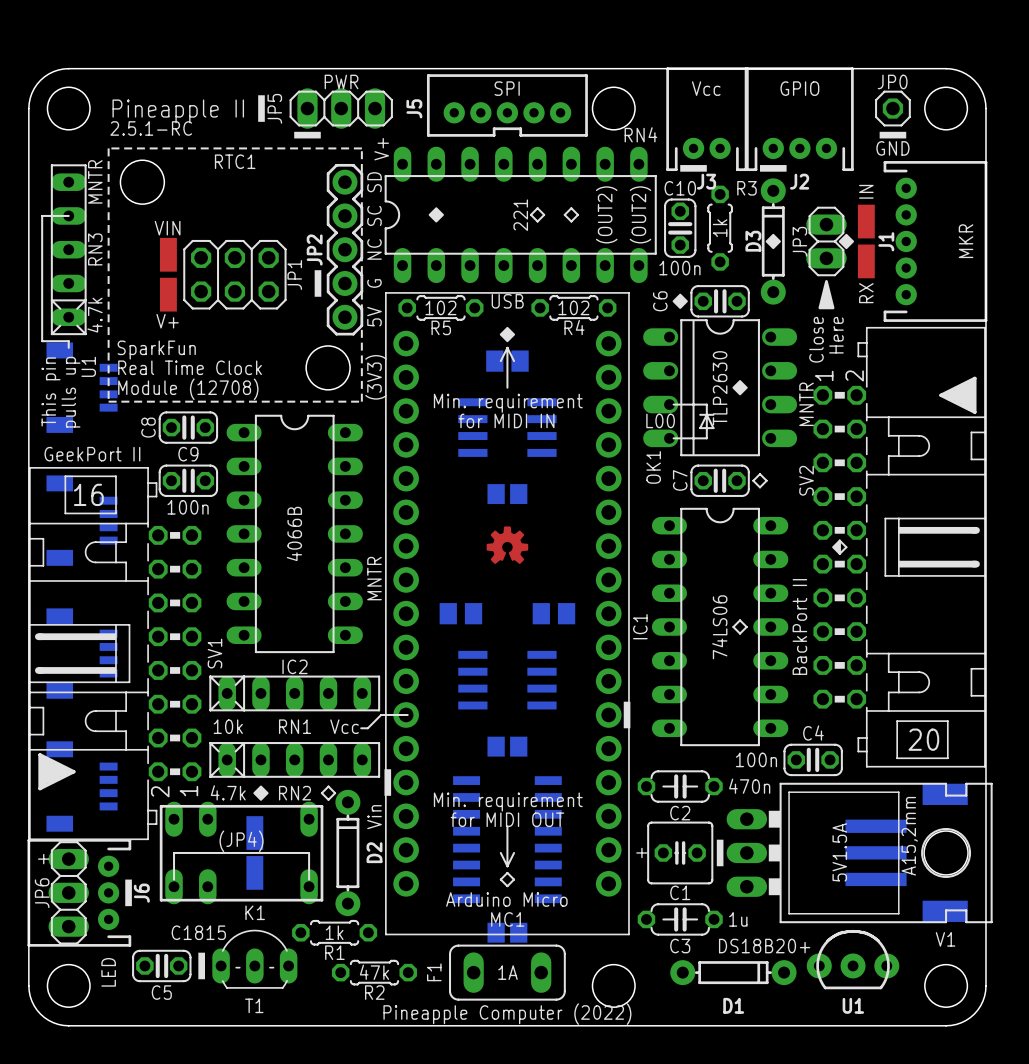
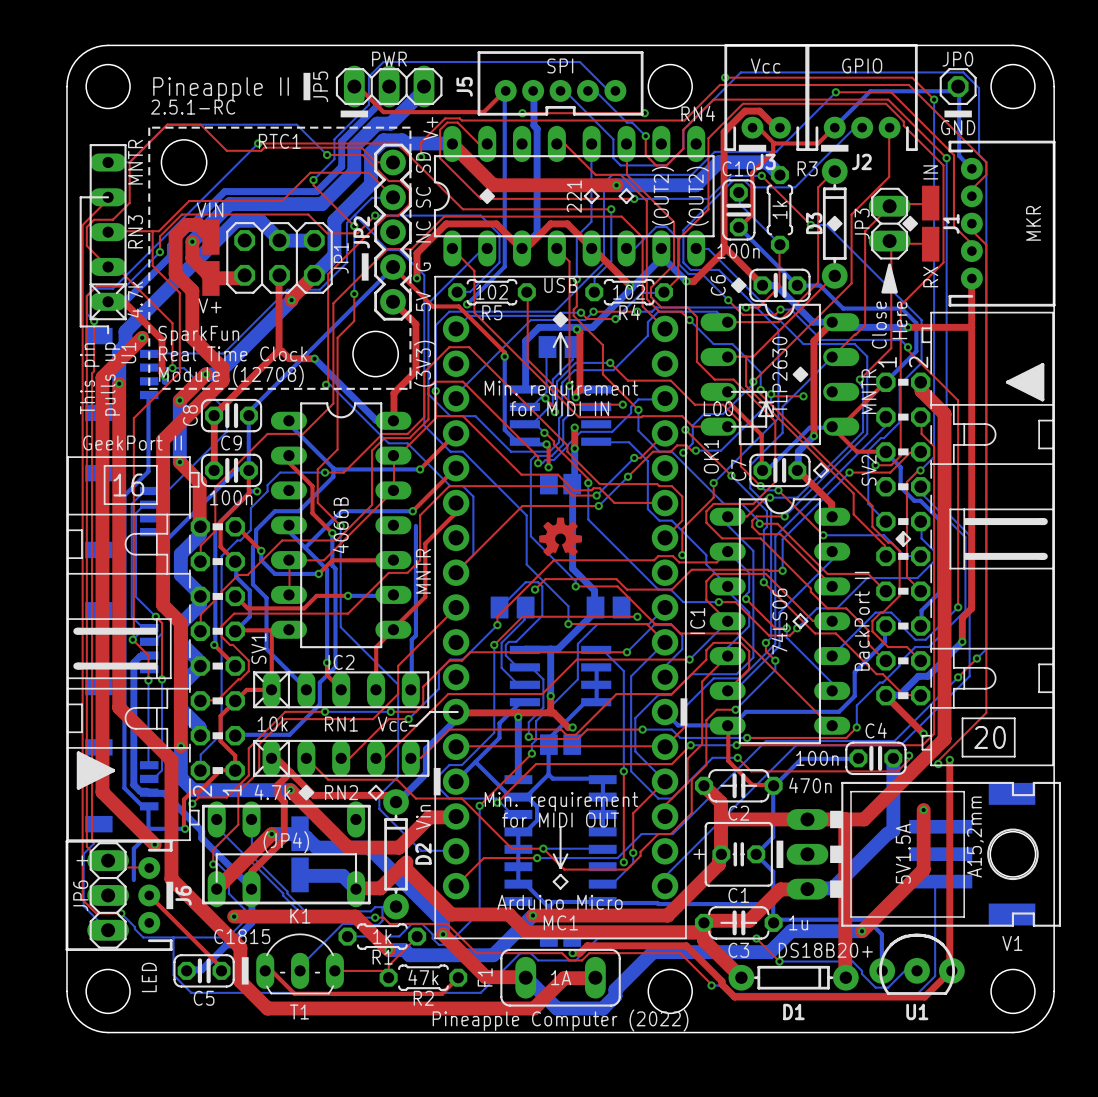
top track: none -> (725, 77) (912, 77) (934, 99)
via: none -> (725, 77)
top track: none -> (354, 86) (358, 87) (383, 112) (483, 112) (505, 90)
bottom track: none -> (389, 86) (388, 94) (341, 141) (341, 166) (316, 191) (224, 191) (170, 245) (170, 256) (125, 301) (108, 301)
bottom track: none -> (424, 86) (423, 91) (390, 123) (377, 123) (354, 146) (354, 171) (321, 204) (229, 204) (192, 241)
bottom track: none -> (505, 90) (504, 266) (467, 304)
bottom track: none -> (533, 90) (533, 125) (537, 128) (537, 233) (522, 248)
bottom track: none -> (560, 90) (565, 91) (613, 139) (613, 158) (620, 165) (666, 165) (683, 148) (683, 129) (740, 72) (963, 72) (979, 88) (979, 154) (986, 162) (986, 649) (976, 658)
bottom track: none -> (587, 90) (595, 91) (626, 122) (632, 122) (645, 136)
bottom track: none -> (615, 90) (608, 90) (579, 62) (383, 62) (368, 76) (368, 104) (334, 139) (334, 159) (313, 180)
top track: none -> (835, 92) (891, 92) (953, 154) (953, 226) (971, 243) (971, 251)
bottom track: none -> (835, 92) (776, 151) (714, 151) (691, 174) (612, 174) (603, 183) (603, 262) (554, 311) (449, 311) (435, 325) (435, 391)
via: none -> (835, 92)
bottom track: none -> (934, 99) (934, 456) (920, 470)
via: none -> (934, 99)
top track: none -> (522, 113) (644, 113)
via: none -> (522, 113)
via: none -> (644, 113)
top track: none -> (752, 127) (758, 127) (774, 143)
top track: none -> (779, 127) (775, 126) (759, 111) (745, 111) (724, 131) (724, 246) (762, 285)
top track: none -> (834, 127) (818, 143) (774, 143)
bottom track: none -> (834, 127) (870, 91) (958, 91) (958, 86) (959, 156) (971, 168)
bottom track: none -> (862, 127) (854, 127) (795, 187) (751, 187) (743, 180) (733, 180) (683, 230) (683, 262) (690, 269) (718, 269) (778, 329) (778, 418) (713, 483)
top track: none -> (889, 127) (889, 176) (851, 214) (851, 283) (753, 381)
top track: none -> (645, 136) (645, 154) (656, 165) (666, 165) (683, 148) (683, 129) (713, 99) (888, 99) (946, 158)
via: none -> (645, 136)
top track: none -> (258, 143) (397, 143) (462, 209) (611, 209)
bottom track: none -> (258, 143) (112, 288) (94, 288) (86, 296) (86, 313) (94, 321)
via: none -> (258, 143)
top track: none -> (774, 143) (773, 151) (752, 172) (752, 214) (738, 227)
top track: none -> (452, 143) (493, 185) (616, 185)
bottom track: none -> (452, 143) (405, 143) (402, 140) (383, 140) (371, 152) (371, 184) (334, 220) (334, 255) (314, 275)
top track: none -> (487, 143) (478, 143) (457, 122) (447, 122) (439, 129) (439, 158) (480, 198) (634, 198)
top track: none -> (556, 143) (565, 144) (595, 174) (620, 174) (646, 200) (646, 299) (659, 311) (681, 311) (689, 320)
bottom track: none -> (591, 143) (591, 221) (576, 236) (576, 279)
top track: none -> (626, 143) (626, 174) (673, 221) (673, 264) (650, 287) (650, 297) (661, 307) (687, 307) (696, 316) (696, 361) (714, 379) (733, 379) (775, 421) (775, 481) (753, 503) (713, 503) (706, 511) (706, 522) (722, 538) (760, 538) (810, 588) (810, 591) (827, 608) (846, 608) (868, 630) (868, 643) (885, 660)
top track: none -> (327, 154) (362, 154) (388, 181) (400, 181) (409, 190) (409, 204) (398, 215) (386, 215) (328, 274) (328, 382) (326, 384)
bottom track: none -> (327, 154) (296, 124) (167, 124) (129, 162) (108, 162)
via: none -> (327, 154)
top track: none -> (421, 157) (421, 142) (445, 118) (459, 118) (461, 120) (684, 120) (719, 84) (909, 84) (986, 162) (986, 174) (972, 188) (971, 196)
via: none -> (421, 157)
bottom track: none -> (946, 158) (946, 512) (969, 535) (969, 676) (900, 745) (796, 745) (665, 875) (665, 886)
via: none -> (946, 158)
top track: none -> (392, 162) (376, 162) (361, 147) (264, 147) (261, 150) (226, 150) (200, 124) (167, 124) (129, 162) (129, 203) (112, 219) (94, 219) (86, 227) (86, 245) (108, 267) (117, 267) (172, 323) (172, 368)
top track: none -> (834, 171) (818, 187) (818, 282) (778, 322) (727, 322)
bottom track: none -> (779, 175) (766, 162) (718, 162) (695, 185) (616, 185)
top track: none -> (761, 175) (810, 224)
bottom track: none -> (761, 175) (731, 175) (708, 198) (634, 198)
via: none -> (761, 175)
top track: none -> (313, 180) (313, 185) (354, 226)
via: none -> (313, 180)
via: none -> (616, 185)
bottom track: none -> (738, 192) (739, 204) (779, 244)
top track: none -> (108, 197) (82, 224) (82, 899) (96, 913) (121, 913)
top track: none -> (393, 197) (368, 172) (310, 172) (282, 200) (189, 200) (158, 231) (108, 232)
bottom track: none -> (393, 197) (372, 197) (346, 222) (346, 262) (319, 289) (287, 289) (223, 353) (149, 353)
via: none -> (634, 198)
top track: none -> (930, 203) (892, 204) (865, 231) (865, 325) (832, 357)
bottom track: none -> (611, 209) (611, 261) (594, 278) (594, 292)
via: none -> (611, 209)
bottom track: none -> (354, 215) (387, 250) (399, 250) (424, 275) (424, 425) (450, 451) (462, 451) (526, 515) (526, 564) (568, 606) (568, 624)
top track: none -> (375, 215) (357, 233) (327, 233) (308, 214) (181, 214) (159, 236) (159, 252)
bottom track: none -> (375, 215) (480, 215) (499, 234) (499, 262) (470, 291) (457, 292)
via: none -> (375, 215)
top track: none -> (971, 223) (972, 231) (986, 244) (986, 712) (938, 760) (938, 764)
bottom track: none -> (810, 224) (826, 224) (921, 320) (921, 362) (899, 384) (899, 422) (868, 450) (868, 503) (885, 521)
via: none -> (810, 224)
bottom track: none -> (354, 226) (354, 293)
via: none -> (354, 226)
bottom track: none -> (738, 227) (797, 285)
top track: none -> (152, 231) (152, 265) (179, 292) (179, 372) (133, 418) (132, 639) (148, 655) (148, 680)
top track: none -> (210, 237) (198, 224) (186, 224) (175, 235) (175, 274) (192, 290) (192, 337) (222, 368) (222, 380) (163, 440) (163, 605) (180, 623) (180, 746)
bottom track: none -> (314, 240) (279, 240) (260, 220) (236, 220) (125, 331) (125, 345) (119, 351) (119, 383)
top track: none -> (192, 241) (192, 258) (210, 278) (242, 278) (244, 275)
via: none -> (192, 241)
top track: none -> (779, 244) (779, 286) (758, 307) (746, 307)
top track: none -> (930, 244) (892, 243) (889, 241) (891, 243) (891, 348) (859, 379)
top track: none -> (452, 248) (474, 270) (474, 312) (578, 417) (682, 416) (692, 426) (727, 426)
bottom track: none -> (487, 248) (482, 249) (428, 303) (428, 394) (450, 416) (475, 416) (510, 451) (549, 451) (559, 442) (559, 418) (562, 415) (562, 382) (574, 370) (613, 370) (647, 335) (647, 322) (658, 311) (716, 311) (727, 322)
top track: none -> (556, 248) (569, 261) (569, 385)
bottom track: none -> (626, 248) (635, 247) (656, 227) (666, 227) (679, 239) (679, 264) (688, 274) (702, 274) (728, 300)
bottom track: none -> (696, 248) (708, 249) (803, 344) (854, 344) (867, 356) (867, 433) (784, 516)
top track: none -> (726, 249) (693, 281) (686, 281)
bottom track: none -> (159, 252) (125, 286)
via: none -> (159, 252)
top track: none -> (393, 266) (432, 306) (458, 306) (504, 352) (504, 356)
bottom track: none -> (393, 266) (249, 410) (248, 470) (237, 469) (162, 544)
top track: none -> (279, 275) (279, 350)
top track: none -> (314, 275) (291, 300)
top track: none -> (834, 275) (753, 356) (727, 357)
top track: none -> (416, 278) (416, 253) (446, 223) (496, 223) (522, 248) (526, 247) (550, 223) (567, 223) (630, 285)
via: none -> (416, 278)
top track: none -> (971, 278) (971, 608) (962, 617) (962, 641)
top track: none -> (576, 279) (576, 306) (573, 309) (573, 315) (602, 345) (602, 374) (638, 409)
via: none -> (576, 279)
bottom track: none -> (686, 281) (663, 260) (661, 248) (660, 259) (592, 327) (539, 327) (525, 340) (524, 389)
via: none -> (686, 281)
via: none -> (630, 285)
bottom track: none -> (762, 285) (776, 285) (812, 322) (832, 322) (838, 327) (907, 327)
bottom track: none -> (797, 285) (820, 285) (843, 308) (901, 308) (916, 323) (916, 351) (885, 382)
top track: none -> (125, 286) (96, 286) (86, 296) (86, 846) (100, 860) (107, 860) (115, 867) (149, 868)
top track: none -> (526, 292) (527, 359) (572, 404) (622, 404)
top track: none -> (663, 292) (678, 278) (678, 239) (708, 209) (708, 138) (742, 103) (886, 103) (903, 121) (903, 125) (943, 165) (943, 262) (900, 305) (900, 455) (891, 465) (875, 465)
bottom track: none -> (663, 292) (641, 292) (615, 319)
top track: none -> (354, 293) (354, 321) (337, 337) (337, 449) (317, 469) (317, 502) (340, 525)
via: none -> (354, 293)
bottom track: none -> (291, 300) (217, 374) (205, 374)
via: none -> (291, 300)
top track: none -> (728, 300) (742, 314) (775, 314) (780, 309)
via: none -> (728, 300)
top track: none -> (108, 301) (124, 302) (162, 339) (162, 373) (165, 376)
top track: none -> (393, 301) (415, 324) (415, 371) (393, 393) (393, 420)
via: none -> (467, 304)
bottom track: none -> (746, 307) (656, 307) (652, 311) (637, 311)
via: none -> (746, 307)
bottom track: none -> (780, 309) (790, 309) (821, 339) (900, 339) (907, 347)
via: none -> (780, 309)
top track: none -> (593, 311) (637, 311)
bottom track: none -> (593, 311) (585, 320) (530, 320) (456, 394) (456, 398)
via: none -> (593, 311)
via: none -> (637, 311)
top track: none -> (580, 312) (587, 319) (615, 319)
bottom track: none -> (580, 312) (560, 312) (556, 315) (469, 315) (456, 328)
via: none -> (580, 312)
via: none -> (615, 319)
bottom track: none -> (689, 320) (713, 344) (732, 344) (760, 372) (760, 390)
via: none -> (689, 320)
top track: none -> (94, 321) (94, 371) (92, 373) (92, 841) (94, 843)
via: none -> (94, 321)
top track: none -> (832, 322) (813, 340) (813, 436)
top track: none -> (907, 327) (971, 327)
via: none -> (907, 327)
top track: none -> (665, 328) (642, 306) (642, 237) (621, 216) (444, 216) (411, 249) (387, 249) (333, 303) (333, 403) (303, 433) (267, 433) (215, 487) (215, 531) (200, 545) (200, 561)
top track: none -> (576, 329) (579, 332) (579, 390) (575, 394) (575, 397)
via: none -> (576, 329)
top track: none -> (142, 337) (102, 377) (102, 792) (154, 844)
via: none -> (142, 337)
bottom track: none -> (547, 347) (546, 392) (531, 406) (524, 406)
bottom track: none -> (573, 347) (572, 359) (552, 379) (552, 403) (532, 423) (524, 424) (533, 422) (544, 432)
top track: none -> (907, 347) (907, 350) (958, 400) (958, 607)
via: none -> (907, 347)
top track: none -> (279, 350) (214, 415) (214, 470)
top track: none -> (279, 350) (289, 358) (314, 358)
bottom track: none -> (504, 356) (504, 429) (515, 440) (523, 440) (527, 444) (546, 444)
via: none -> (504, 356)
top track: none -> (746, 356) (746, 385) (853, 493) (853, 514) (885, 545) (885, 556)
bottom track: none -> (832, 357) (782, 406) (782, 432) (750, 465) (750, 488) (771, 509) (771, 637) (765, 642)
bottom track: none -> (314, 358) (376, 420) (393, 420)
via: none -> (314, 358)
top track: none -> (610, 362) (628, 380) (670, 380) (694, 404) (723, 404) (740, 422) (740, 466) (760, 486)
bottom track: none -> (610, 362) (575, 362) (556, 381) (556, 409) (554, 411)
via: none -> (610, 362)
bottom track: none -> (149, 367) (183, 368) (226, 410) (226, 431) (154, 503) (144, 504) (135, 513) (135, 596) (162, 623) (162, 633) (154, 640) (149, 641)
via: none -> (172, 368)
top track: none -> (205, 374) (179, 400)
via: none -> (205, 374)
bottom track: none -> (165, 376) (165, 381)
via: none -> (165, 376)
bottom track: none -> (859, 379) (859, 383) (863, 386) (863, 431) (797, 497) (770, 497)
via: none -> (859, 379)
bottom track: none -> (753, 381) (723, 414) (704, 414) (692, 425) (692, 443) (683, 452)
via: none -> (753, 381)
top track: none -> (885, 382) (836, 430) (832, 426) (856, 451) (885, 451)
top track: none -> (920, 382) (921, 391) (944, 414) (944, 738) (864, 819) (807, 819)
top track: none -> (119, 383) (119, 707) (171, 759) (171, 878) (240, 947) (240, 981) (267, 1008) (533, 1008) (564, 978) (595, 977)
via: none -> (119, 383)
bottom track: none -> (326, 384) (330, 384) (388, 443) (407, 443) (450, 486) (462, 486) (473, 496) (473, 555) (456, 572)
via: none -> (326, 384)
bottom track: none -> (569, 385) (568, 415) (563, 420) (563, 444) (551, 455) (535, 455) (530, 460) (530, 536) (575, 581) (575, 586)
via: none -> (569, 385)
top track: none -> (760, 390) (760, 394) (872, 506) (872, 526) (899, 550) (899, 595) (872, 620) (872, 631) (888, 647) (906, 647) (920, 660)
via: none -> (760, 390)
top track: none -> (435, 391) (435, 418) (398, 455) (393, 455) (393, 490) (323, 560) (288, 560) (288, 594)
via: none -> (435, 391)
top track: none -> (727, 391) (728, 401) (761, 434) (762, 470)
top track: none -> (771, 394) (773, 396) (803, 396)
bottom track: none -> (771, 394) (771, 400) (720, 450) (695, 450)
via: none -> (771, 394)
bottom track: none -> (149, 395) (148, 471) (124, 495) (124, 788) (143, 806) (149, 806) (148, 834) (133, 848) (133, 880)
via: none -> (803, 396)
via: none -> (575, 397)
top track: none -> (545, 398) (554, 407) (554, 411)
via: none -> (545, 398)
bottom track: none -> (665, 398) (638, 399) (631, 406) (631, 413) (612, 431) (580, 431) (553, 460) (545, 460) (542, 463) (538, 463)
bottom track: none -> (179, 400) (179, 462)
via: none -> (179, 400)
via: none -> (622, 404)
bottom track: none -> (638, 409) (638, 430) (659, 451) (671, 451) (724, 503) (741, 503) (759, 523)
via: none -> (638, 409)
via: none -> (554, 411)
top track: none -> (435, 416) (462, 416) (521, 474) (558, 474) (573, 490) (599, 488) (614, 502) (665, 503)
bottom track: none -> (885, 417) (885, 426) (775, 536) (775, 643) (740, 678) (713, 678) (685, 706)
top track: none -> (920, 417) (921, 433) (934, 446) (934, 733) (922, 745) (736, 745)
bottom track: none -> (288, 420) (289, 424) (334, 469) (420, 469)
bottom track: none -> (832, 426) (809, 427) (768, 469) (762, 470)
top track: none -> (574, 427) (574, 448)
via: none -> (574, 427)
top track: none -> (685, 429) (731, 475)
via: none -> (685, 429)
top track: none -> (456, 433) (420, 469)
top track: none -> (544, 432) (588, 478) (588, 483)
via: none -> (544, 432)
top track: none -> (665, 433) (640, 457) (634, 457)
bottom track: none -> (813, 436) (798, 451) (797, 470)
via: none -> (813, 436)
bottom track: none -> (596, 441) (629, 442) (647, 461) (647, 509) (659, 520) (671, 520) (706, 555) (706, 564) (728, 586) (728, 591) (749, 612) (749, 626) (728, 647) (727, 656)
top track: none -> (546, 444) (548, 446) (548, 467)
via: none -> (546, 444)
bottom track: none -> (574, 448) (574, 481) (572, 484) (572, 568) (594, 590) (595, 607) (593, 613) (558, 649) (524, 649)
via: none -> (574, 448)
top track: none -> (695, 450) (691, 450) (686, 445) (677, 445) (670, 451) (653, 451) (628, 476)
via: none -> (695, 450)
bottom track: none -> (885, 451) (900, 467) (900, 487) (914, 500) (920, 500) (939, 519) (939, 592) (921, 610) (920, 626)
top track: none -> (920, 451) (910, 452) (890, 472) (849, 472)
via: none -> (683, 452)
top track: none -> (288, 455) (289, 463) (312, 486) (312, 513) (332, 533)
bottom track: none -> (634, 457) (596, 495)
via: none -> (634, 457)
top track: none -> (179, 462) (199, 481) (200, 526)
via: none -> (179, 462)
top track: none -> (538, 463) (538, 456) (462, 381) (434, 381) (428, 387) (428, 419) (409, 438) (384, 438) (372, 450) (372, 504) (336, 540) (282, 540) (247, 574) (238, 574) (200, 614) (200, 631)
via: none -> (538, 463)
via: none -> (875, 465)
via: none -> (548, 467)
bottom track: none -> (333, 468) (333, 476) (298, 511) (274, 511) (256, 530) (256, 543) (252, 546) (252, 584) (266, 597) (266, 649) (306, 689)
top track: none -> (456, 468) (412, 511)
via: none -> (420, 469)
top track: none -> (248, 470) (248, 493) (220, 521) (220, 546) (235, 561)
top track: none -> (797, 470) (831, 503) (832, 516)
top track: none -> (920, 470) (906, 481) (906, 577) (920, 591)
via: none -> (920, 470)
top track: none -> (325, 472) (343, 472) (382, 433) (407, 433) (424, 417) (424, 372) (449, 347) (469, 347) (567, 445) (567, 451) (599, 484) (657, 484) (659, 486) (671, 486) (682, 496) (682, 520) (665, 537)
bottom track: none -> (325, 472) (280, 472) (267, 485) (267, 491) (250, 508) (250, 530) (221, 556) (221, 733) (200, 754) (200, 770)
via: none -> (325, 472)
bottom track: none -> (849, 472) (782, 539) (782, 570)
via: none -> (849, 472)
bottom track: none -> (731, 475) (766, 511) (766, 526) (763, 530) (763, 582)
via: none -> (731, 475)
bottom track: none -> (628, 476) (598, 506)
via: none -> (628, 476)
bottom track: none -> (588, 483) (588, 519) (658, 589) (670, 589) (683, 602) (718, 602)
via: none -> (588, 483)
top track: none -> (713, 483) (713, 497) (682, 528) (682, 555)
via: none -> (713, 483)
bottom track: none -> (760, 486) (764, 490) (778, 490)
via: none -> (760, 486)
bottom track: none -> (920, 486) (921, 493) (965, 537) (965, 610) (928, 647) (915, 647) (882, 682) (879, 682) (856, 705) (856, 727)
bottom track: none -> (149, 490) (144, 491) (131, 503) (131, 616) (143, 628) (149, 628) (144, 628) (132, 639)
top track: none -> (778, 490) (823, 535)
via: none -> (778, 490)
bottom track: none -> (257, 491) (250, 491) (215, 526) (214, 644)
via: none -> (257, 491)
top track: none -> (596, 495) (572, 495) (563, 486) (449, 486) (420, 515) (420, 560) (407, 572) (388, 572) (348, 613) (234, 613) (221, 626) (221, 636) (248, 660) (248, 671) (217, 700) (200, 700)
via: none -> (596, 495)
top track: none -> (770, 497) (765, 497) (747, 516) (727, 516)
via: none -> (770, 497)
top track: none -> (456, 503) (455, 513) (425, 543) (425, 596) (376, 647) (376, 689)
top track: none -> (598, 506) (522, 506) (456, 572)
via: none -> (598, 506)
bottom track: none -> (412, 511) (341, 511) (305, 547)
via: none -> (412, 511)
bottom track: none -> (727, 516) (728, 525) (753, 550) (753, 657) (736, 674) (691, 674) (670, 695) (658, 695) (635, 718) (635, 751) (665, 781)
top track: none -> (784, 516) (756, 516) (752, 520) (752, 526) (759, 534) (780, 534) (832, 586)
via: none -> (784, 516)
bottom track: none -> (920, 521) (921, 538) (934, 550) (934, 561) (917, 578) (867, 578) (836, 608) (817, 608) (797, 628)
top track: none -> (759, 523) (777, 523) (827, 573) (868, 573) (885, 591)
via: none -> (759, 523)
bottom track: none -> (288, 525) (289, 532) (327, 569) (327, 662)
bottom track: none -> (340, 525) (340, 627) (398, 684) (398, 776) (379, 795) (379, 808) (421, 850) (456, 851)
via: none -> (340, 525)
bottom track: none -> (415, 525) (415, 635) (411, 639) (410, 689)
bottom track: none -> (200, 526) (199, 535) (180, 554) (180, 574) (200, 596) (199, 605) (180, 624) (180, 642) (197, 659) (200, 666) (180, 685) (180, 708) (199, 727) (200, 735)
top track: none -> (235, 526) (261, 550)
bottom track: none -> (332, 533) (332, 565) (335, 568) (335, 666) (319, 682) (319, 704) (289, 734) (235, 735)
via: none -> (332, 533)
bottom track: none -> (823, 535) (883, 535) (904, 556) (920, 556)
via: none -> (823, 535)
bottom track: none -> (261, 550) (261, 560) (274, 573) (318, 573)
via: none -> (261, 550)
top track: none -> (727, 551) (716, 562) (679, 562) (672, 556) (658, 556) (654, 560) (553, 560) (497, 616) (497, 625)
bottom track: none -> (727, 551) (749, 572) (749, 591) (746, 594) (746, 598)
bottom track: none -> (832, 551) (831, 560) (779, 612) (779, 646) (735, 689) (727, 690)
via: none -> (682, 555)
top track: none -> (393, 560) (332, 560) (318, 573)
bottom track: none -> (235, 561) (236, 577) (249, 590) (249, 616) (235, 631)
top track: none -> (782, 570) (691, 569) (671, 589) (626, 589) (616, 579) (545, 579) (535, 589)
via: none -> (782, 570)
via: none -> (318, 573)
top track: none -> (763, 582) (815, 633) (835, 633) (876, 674) (882, 674) (903, 695) (920, 695)
via: none -> (763, 582)
top track: none -> (575, 586) (617, 586) (655, 624) (670, 624) (680, 633) (737, 633) (829, 725) (832, 725)
via: none -> (575, 586)
via: none -> (535, 589)
bottom track: none -> (393, 594) (348, 595)
top track: none -> (348, 595) (316, 595) (304, 608) (247, 608) (235, 596)
via: none -> (348, 595)
top track: none -> (746, 598) (775, 628) (786, 628)
via: none -> (746, 598)
top track: none -> (718, 602) (735, 602) (769, 635) (789, 635) (797, 628)
via: none -> (718, 602)
top track: none -> (456, 607) (398, 665) (398, 694) (373, 719) (284, 719) (259, 744) (259, 771) (238, 792) (238, 824) (213, 849) (213, 864)
bottom track: none -> (499, 607) (525, 582) (538, 582) (542, 586) (542, 615) (516, 641) (508, 641) (505, 644) (505, 655) (517, 666) (531, 667) (543, 679) (543, 707) (528, 722) (528, 736)
bottom track: none -> (525, 607) (524, 619) (501, 642) (501, 667) (518, 684) (524, 684)
bottom track: none -> (665, 607) (648, 624) (597, 624) (577, 643) (577, 679) (536, 721) (536, 740) (531, 744) (531, 753)
bottom track: none -> (958, 607) (925, 639) (915, 639) (891, 612) (875, 612) (832, 656)
via: none -> (958, 607)
top track: none -> (155, 616) (162, 623) (162, 679)
via: none -> (155, 616)
top track: none -> (637, 616) (522, 616) (494, 644)
via: none -> (637, 616)
top track: none -> (727, 621) (706, 600) (706, 581) (713, 573) (765, 573) (812, 620) (832, 621)
bottom track: none -> (727, 621) (689, 659)
top track: none -> (568, 624) (646, 624) (665, 642)
via: none -> (568, 624)
bottom track: none -> (497, 625) (462, 659) (450, 659) (438, 671) (438, 688) (408, 719)
via: none -> (497, 625)
bottom track: none -> (885, 626) (885, 641) (854, 672) (854, 696) (839, 711) (746, 711) (733, 724) (727, 725) (678, 725) (665, 712)
bottom track: none -> (786, 628) (786, 637) (831, 682) (832, 690)
via: none -> (786, 628)
via: none -> (797, 628)
top track: none -> (235, 631) (288, 629) (271, 631) (271, 689) (246, 689) (220, 716) (220, 741) (235, 755) (235, 770)
via: none -> (132, 639)
bottom track: none -> (962, 641) (927, 676) (918, 676) (899, 695) (885, 695)
via: none -> (962, 641)
bottom track: none -> (665, 642) (631, 676) (631, 771) (658, 798) (671, 798) (712, 757) (737, 757)
top track: none -> (765, 642) (765, 651) (775, 660)
via: none -> (765, 642)
top track: none -> (214, 644) (235, 665)
via: none -> (214, 644)
bottom track: none -> (494, 644) (494, 732) (461, 765) (449, 765) (438, 775) (438, 788) (449, 798) (496, 798) (512, 814) (518, 814)
via: none -> (494, 644)
bottom track: none -> (550, 649) (550, 696)
bottom track: none -> (596, 649) (602, 650) (623, 671) (623, 771)
top track: none -> (626, 652) (470, 652) (461, 660) (449, 660) (423, 686) (423, 704) (415, 711) (390, 711)
bottom track: none -> (626, 652) (654, 625) (671, 625) (682, 635) (682, 649) (665, 665) (665, 677)
via: none -> (626, 652)
bottom track: none -> (149, 655) (140, 656) (133, 662) (133, 784) (140, 791) (164, 793) (201, 830) (201, 838) (251, 888) (251, 922) (201, 969) (186, 970)
top track: none -> (727, 656) (702, 681) (702, 744) (687, 758) (687, 782) (665, 804) (665, 816)
top track: none -> (976, 658) (958, 677)
via: none -> (976, 658)
top track: none -> (689, 659) (576, 659) (542, 694) (448, 694) (384, 757) (376, 758)
via: none -> (689, 659)
bottom track: none -> (775, 660) (775, 670) (735, 709)
via: none -> (775, 660)
top track: none -> (327, 662) (327, 675) (341, 689)
via: none -> (327, 662)
bottom track: none -> (596, 667) (596, 701) (594, 703) (584, 703) (549, 737) (548, 774)
bottom track: none -> (958, 677) (894, 741) (765, 741) (672, 834) (641, 834) (617, 858) (537, 858)
via: none -> (958, 677)
bottom track: none -> (162, 679) (162, 770) (153, 778) (149, 778)
via: none -> (162, 679)
bottom track: none -> (148, 680) (149, 765)
via: none -> (148, 680)
top track: none -> (727, 690) (749, 668) (749, 651) (740, 642) (713, 642) (706, 650) (706, 659) (671, 694) (616, 694) (575, 734) (566, 734) (561, 729) (449, 729) (421, 757) (410, 758)
top track: none -> (550, 696) (550, 712)
via: none -> (550, 696)
top track: none -> (885, 695) (923, 733)
bottom track: none -> (524, 702) (520, 702) (499, 723) (499, 737) (456, 781)
top track: none -> (685, 706) (685, 726) (665, 746) (456, 746)
top track: none -> (735, 709) (716, 709) (706, 720) (706, 765) (691, 779) (691, 813) (670, 834) (658, 834) (640, 851) (640, 855) (626, 869) (564, 869) (543, 848) (512, 848) (461, 798) (415, 798) (397, 779) (328, 779) (306, 758)
via: none -> (735, 709)
top track: none -> (325, 711) (285, 711) (248, 748) (248, 775) (226, 797) (198, 797) (192, 803)
bottom track: none -> (325, 711) (390, 711)
via: none -> (325, 711)
via: none -> (390, 711)
top track: none -> (456, 712) (553, 712) (568, 727) (572, 727)
bottom track: none -> (456, 712) (455, 720) (426, 749) (426, 773) (396, 802)
bottom track: none -> (518, 717) (518, 779)
via: none -> (518, 717)
top track: none -> (408, 719) (388, 719) (350, 757) (341, 758)
via: none -> (408, 719)
top track: none -> (727, 725) (728, 760) (752, 784) (773, 785)
via: none -> (572, 727)
top track: none -> (856, 727) (846, 737) (747, 737)
via: none -> (856, 727)
top track: none -> (642, 729) (587, 729) (577, 738) (530, 738) (528, 736)
bottom track: none -> (642, 729) (671, 729) (680, 737) (747, 737)
via: none -> (642, 729)
via: none -> (923, 733)
via: none -> (528, 736)
via: none -> (747, 737)
top track: none -> (690, 745) (671, 764) (536, 764) (497, 802)
bottom track: none -> (690, 745) (736, 745)
via: none -> (690, 745)
via: none -> (736, 745)
bottom track: none -> (180, 746) (180, 777) (193, 790) (290, 790)
via: none -> (180, 746)
top track: none -> (531, 753) (479, 805)
via: none -> (531, 753)
top track: none -> (909, 755) (909, 759) (897, 771) (751, 771) (737, 757)
via: none -> (909, 755)
top track: none -> (271, 758) (276, 758) (313, 795) (388, 795) (396, 802)
via: none -> (737, 757)
bottom track: none -> (858, 758) (801, 758) (773, 786) (773, 837) (756, 854) (773, 871) (773, 922) (774, 919) (867, 919) (881, 934) (882, 970)
bottom track: none -> (893, 758) (893, 830) (887, 834) (832, 888) (807, 889)
top track: none -> (949, 759) (949, 967) (951, 970) (924, 997) (734, 997) (722, 984) (722, 981) (686, 945) (587, 945) (579, 953) (572, 953)
via: none -> (949, 759)
bottom track: none -> (475, 761) (510, 797) (518, 797)
via: none -> (938, 764)
top track: none -> (235, 770) (220, 770) (198, 792) (191, 792) (183, 799) (185, 828)
top track: none -> (623, 771) (623, 862)
via: none -> (623, 771)
top track: none -> (290, 772) (278, 784) (278, 795) (284, 801) (284, 839) (251, 871) (251, 889)
bottom track: none -> (548, 774) (526, 796) (518, 797)
bottom track: none -> (548, 774) (552, 778) (602, 779)
bottom track: none -> (602, 779) (602, 831)
top track: none -> (665, 781) (633, 813) (633, 852)
top track: none -> (703, 785) (720, 802) (721, 854) (718, 864) (667, 915) (532, 915)
top track: none -> (290, 790) (348, 847) (399, 847) (429, 817) (456, 816)
via: none -> (290, 790)
bottom track: none -> (518, 797) (527, 797) (537, 806) (537, 820) (525, 831) (518, 831)
via: none -> (497, 802)
via: none -> (192, 803)
bottom track: none -> (479, 805) (479, 912) (447, 944) (438, 944) (432, 938) (432, 934) (422, 923) (411, 923) (399, 936) (347, 936)
via: none -> (479, 805)
top track: none -> (923, 810) (923, 869) (862, 931)
via: none -> (923, 810)
bottom track: none -> (216, 819) (217, 827) (305, 917) (375, 917)
bottom track: none -> (251, 819) (251, 855) (305, 911) (371, 911) (375, 907) (396, 906)
top track: none -> (720, 819) (807, 819)
top track: none -> (845, 819) (845, 977)
bottom track: none -> (148, 828) (185, 828)
via: none -> (185, 828)
bottom track: none -> (518, 831) (518, 884) (525, 884) (548, 907) (553, 901) (773, 904)
top track: none -> (271, 834) (216, 889)
bottom track: none -> (271, 834) (300, 833) (316, 847) (368, 847) (443, 921) (443, 934)
via: none -> (271, 834)
bottom track: none -> (94, 843) (83, 853) (83, 906) (108, 930)
via: none -> (154, 844)
bottom track: none -> (543, 848) (602, 849)
via: none -> (543, 848)
bottom track: none -> (633, 852) (633, 863) (613, 883) (602, 884)
via: none -> (633, 852)
top track: none -> (537, 858) (483, 858) (456, 886)
via: none -> (537, 858)
top track: none -> (406, 862) (380, 888) (356, 889)
via: none -> (623, 862)
bottom track: none -> (213, 864) (218, 864) (228, 874) (228, 893) (244, 909) (244, 920) (227, 937) (143, 937) (121, 913)
via: none -> (213, 864)
top track: none -> (402, 865) (451, 914) (508, 914) (526, 932) (704, 932)
bottom track: none -> (300, 874) (342, 875) (356, 889)
bottom track: none -> (940, 881) (935, 887) (935, 976) (917, 993) (734, 993) (726, 985) (711, 985)
top track: none -> (807, 889) (780, 889) (749, 920) (710, 920) (703, 922) (704, 940) (741, 977)
top track: none -> (149, 895) (220, 966) (221, 970)
bottom track: none -> (382, 907) (382, 920) (378, 924) (342, 923) (301, 965) (300, 970)
via: none -> (121, 913)
bottom track: none -> (532, 915) (493, 955) (409, 955) (404, 950) (388, 950)
via: none -> (532, 915)
top track: none -> (234, 916) (355, 916) (388, 950)
via: none -> (234, 916)
top track: none -> (375, 917) (383, 917) (389, 923) (447, 923) (476, 953) (562, 953) (569, 960) (582, 960) (589, 953) (680, 953) (711, 985)
via: none -> (375, 917)
bottom track: none -> (862, 931) (790, 931) (770, 952) (653, 952) (615, 989) (615, 995) (602, 1008) (556, 1008) (525, 977)
via: none -> (862, 931)
top track: none -> (443, 934) (485, 977) (525, 977)
via: none -> (443, 934)
top track: none -> (417, 936) (388, 965) (388, 977) (388, 977) (388, 970) (335, 970) (334, 970)
bottom track: none -> (173, 937) (173, 975) (191, 992) (480, 992) (520, 953) (530, 953) (538, 960) (575, 960) (597, 938) (756, 938)
top track: none -> (756, 938) (779, 961)
via: none -> (756, 938)
via: none -> (388, 950)
via: none -> (572, 953)
bottom track: none -> (779, 961) (852, 961) (875, 987) (888, 987) (904, 970) (917, 970)
via: none -> (779, 961)
top track: none -> (265, 970) (271, 970) (294, 993) (442, 993) (458, 977)
via: none -> (711, 985)

